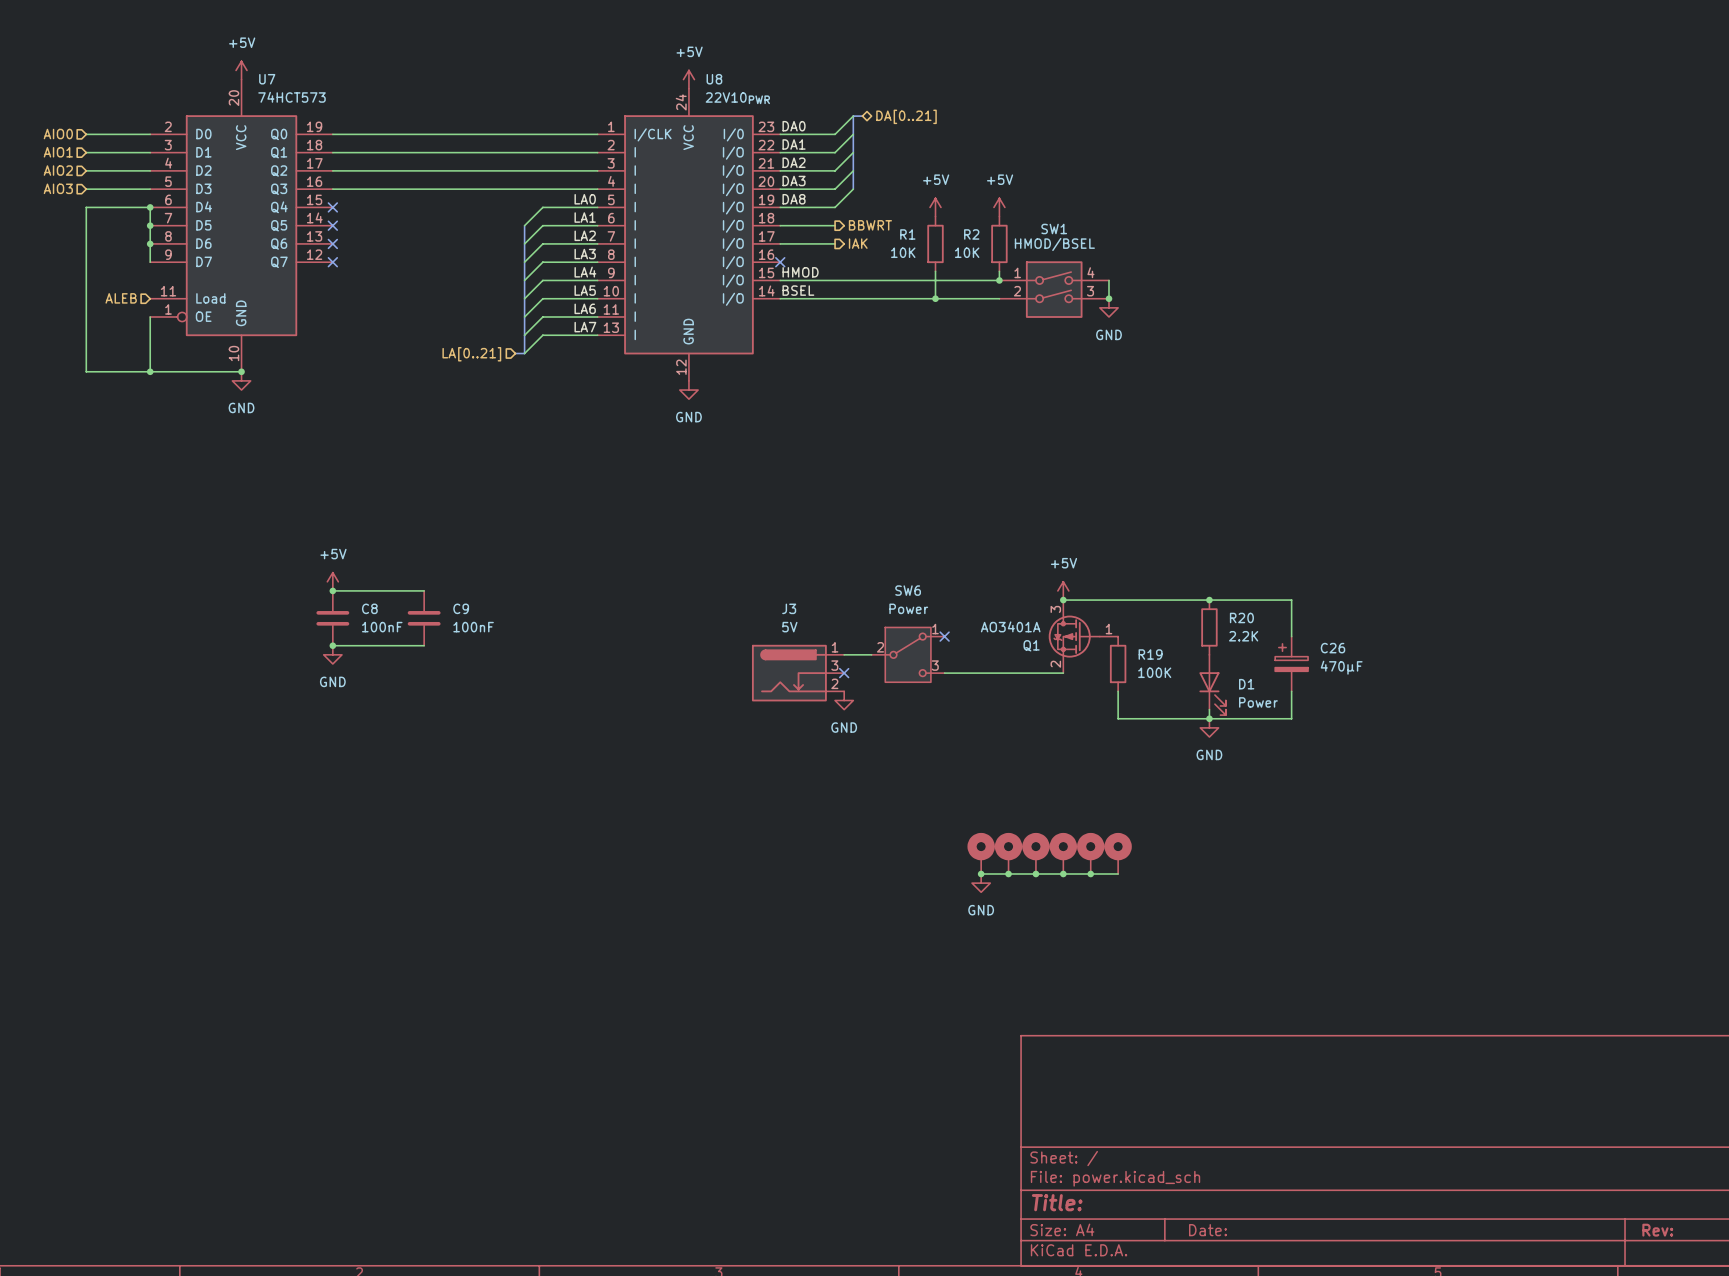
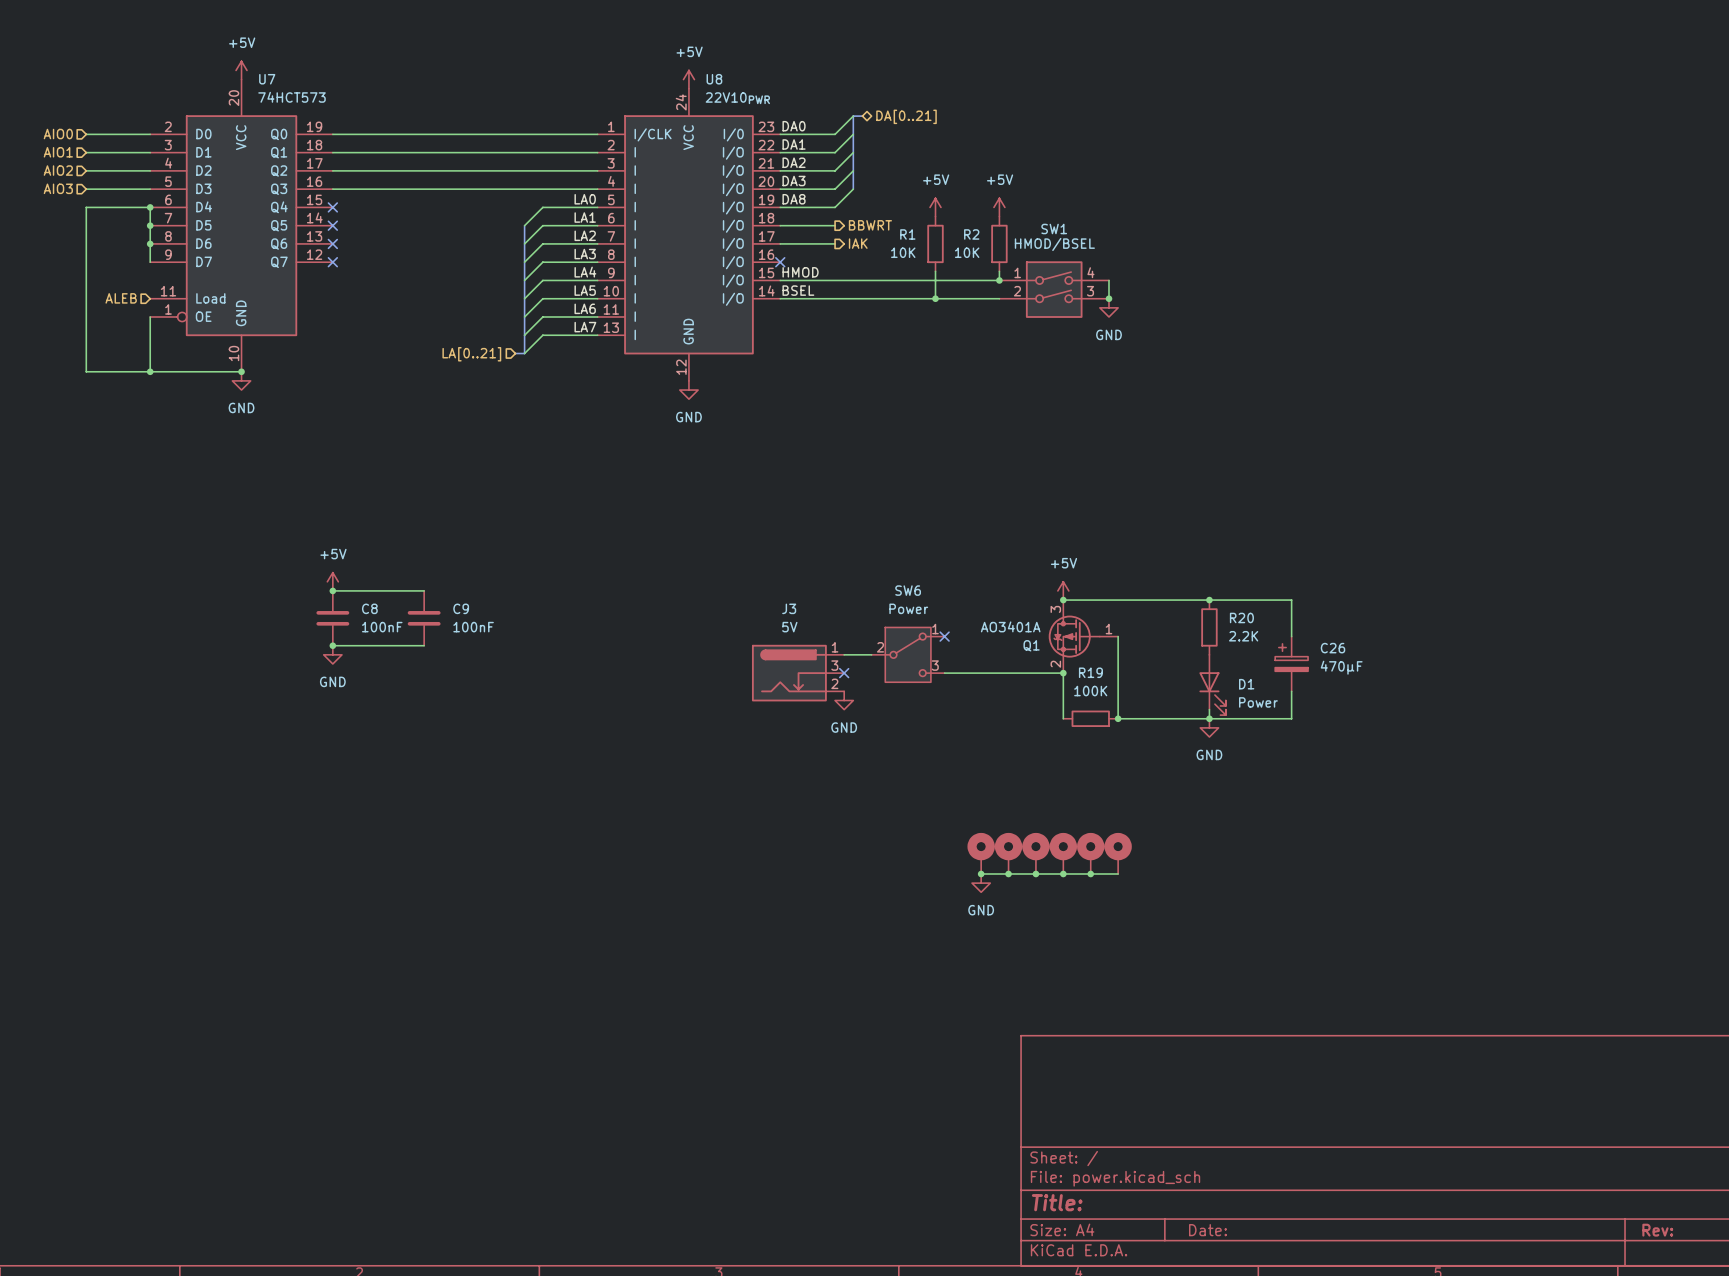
wire: none -> (1118, 636) (1118, 691)
R19 name position: R19 (1150, 654) -> R19 (1090, 672)
R19 rotation: 0° (1118, 663) -> 90° clockwise (1090, 718)
R19 position: (1118, 663) -> (1090, 718)
R19 value position: 100K (1154, 672) -> 100K (1090, 691)
wire: none -> (1063, 673) (1063, 718)
junction: none -> (1063, 673)
junction: none -> (1118, 718)

